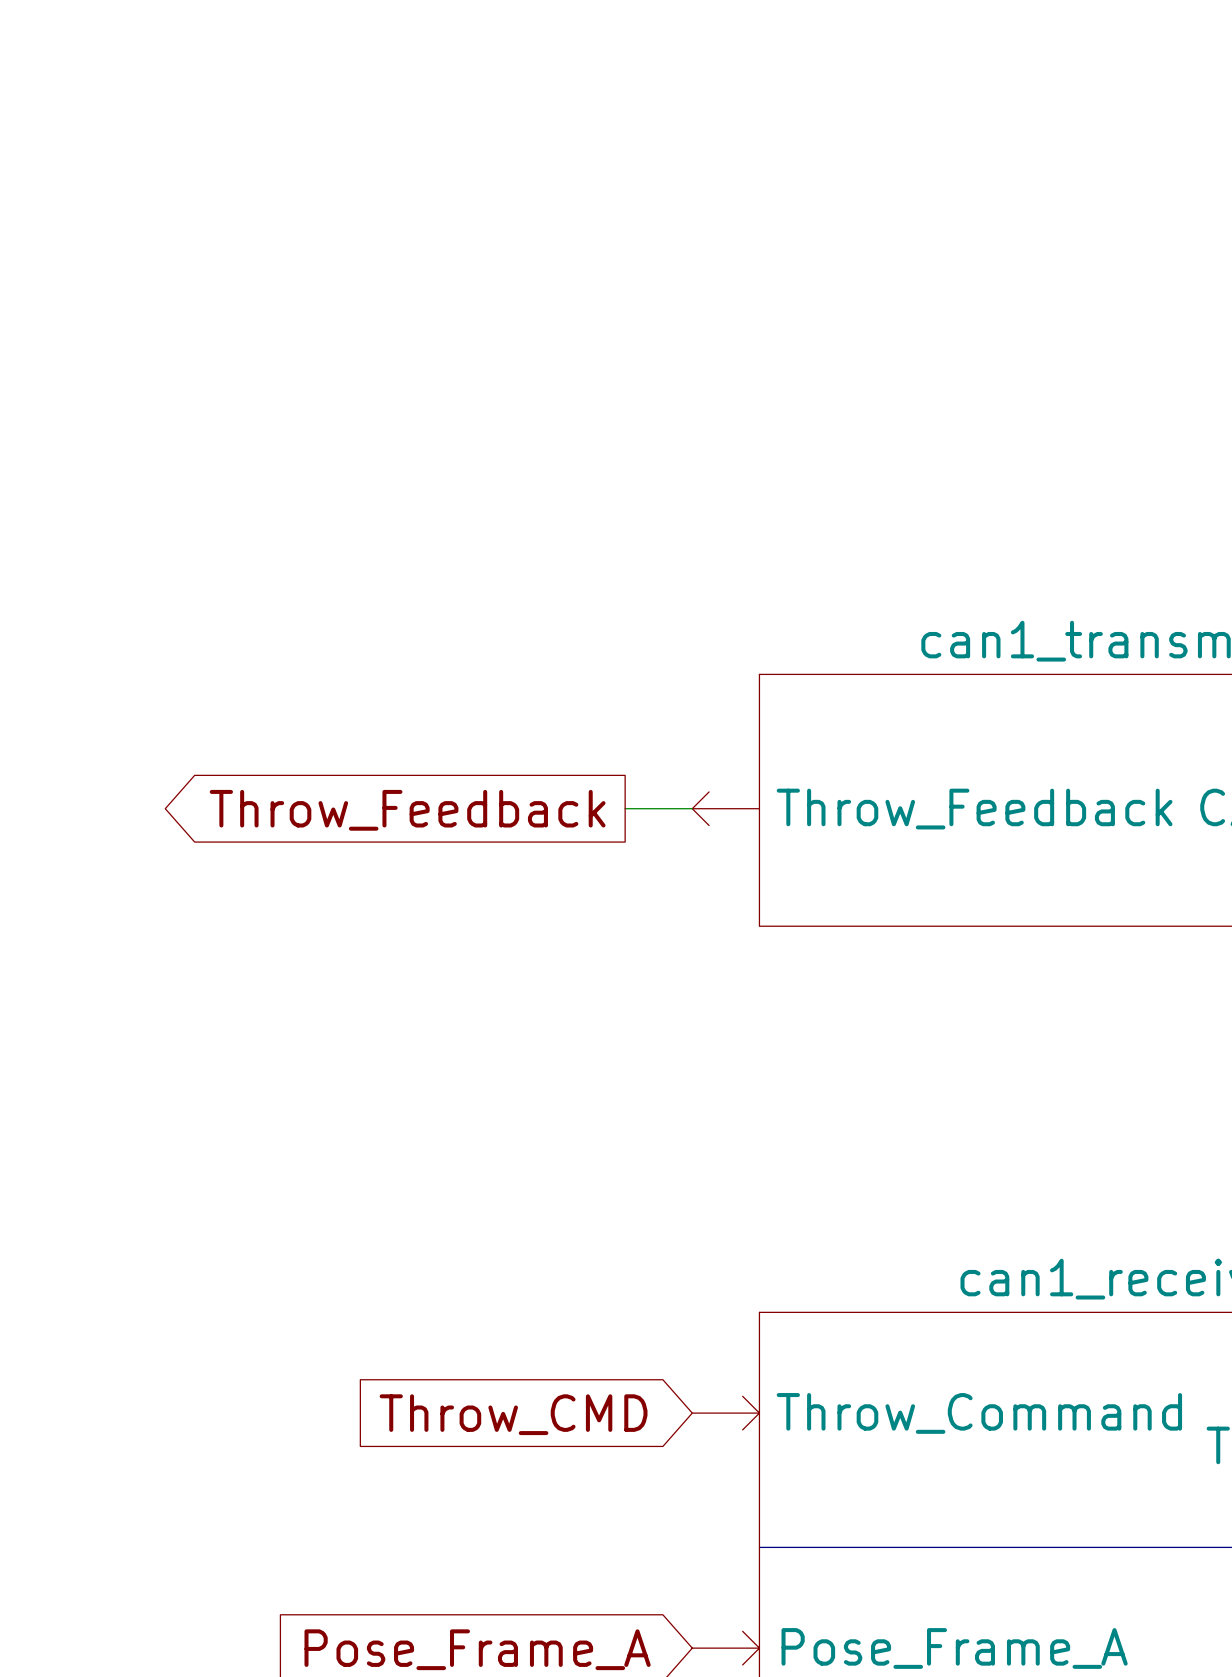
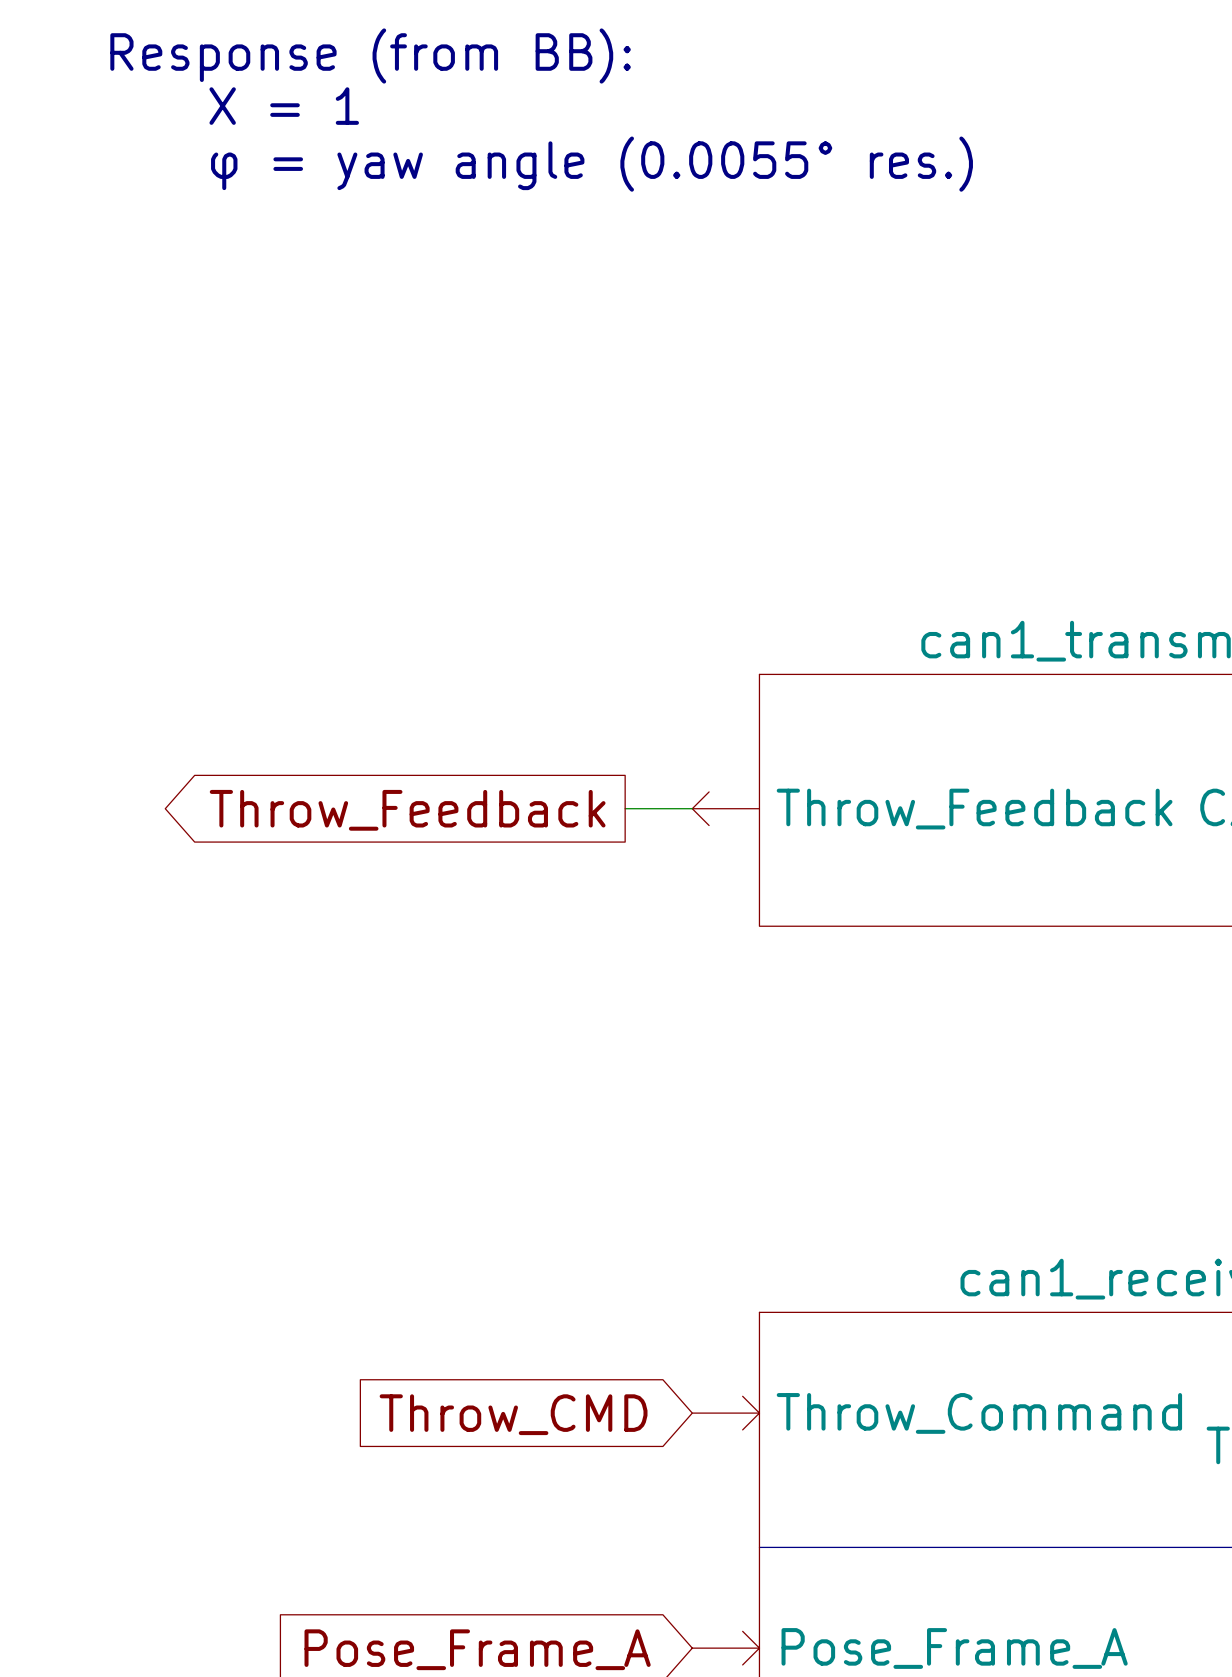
text: none -> Response (from BB): (370, 56)
text: none -> X = 1 (284, 106)
text: none -> φ = yaw angle (0.0055° res.) (592, 164)

